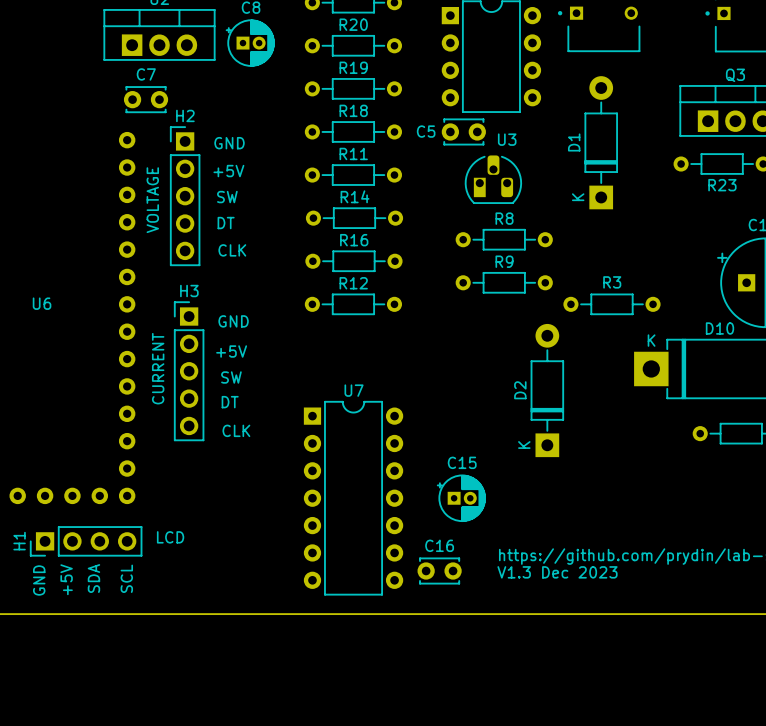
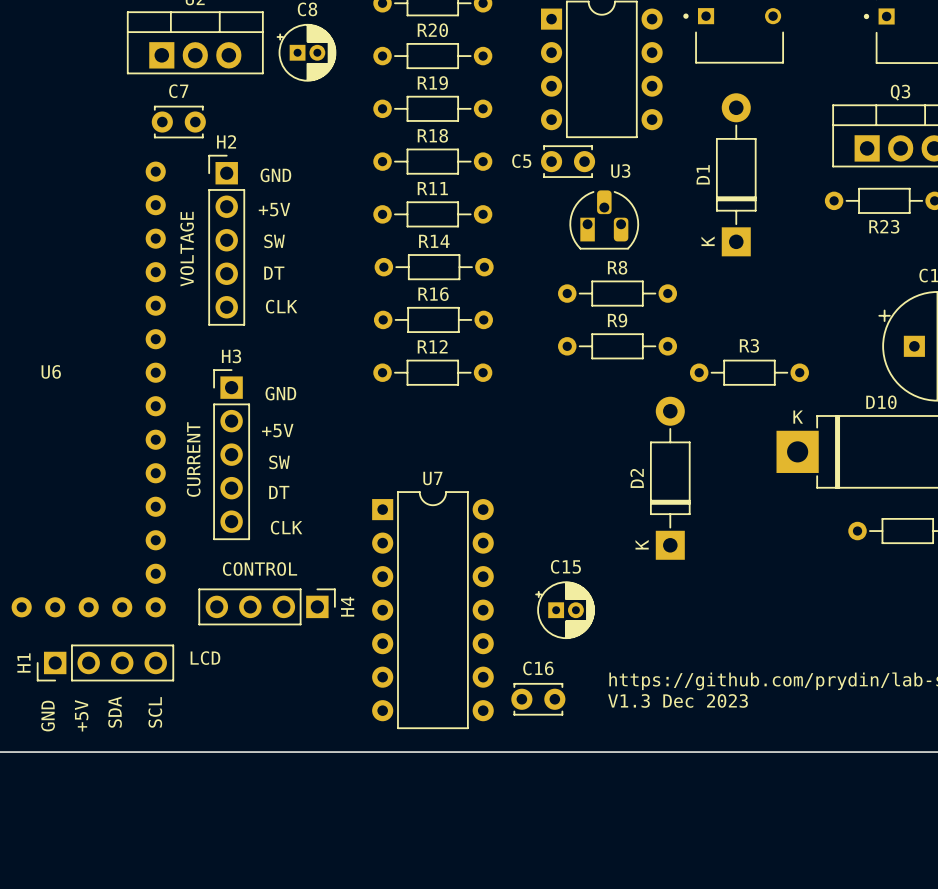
text: none -> CONTROL (260, 569)
H4: none -> (267, 606)

